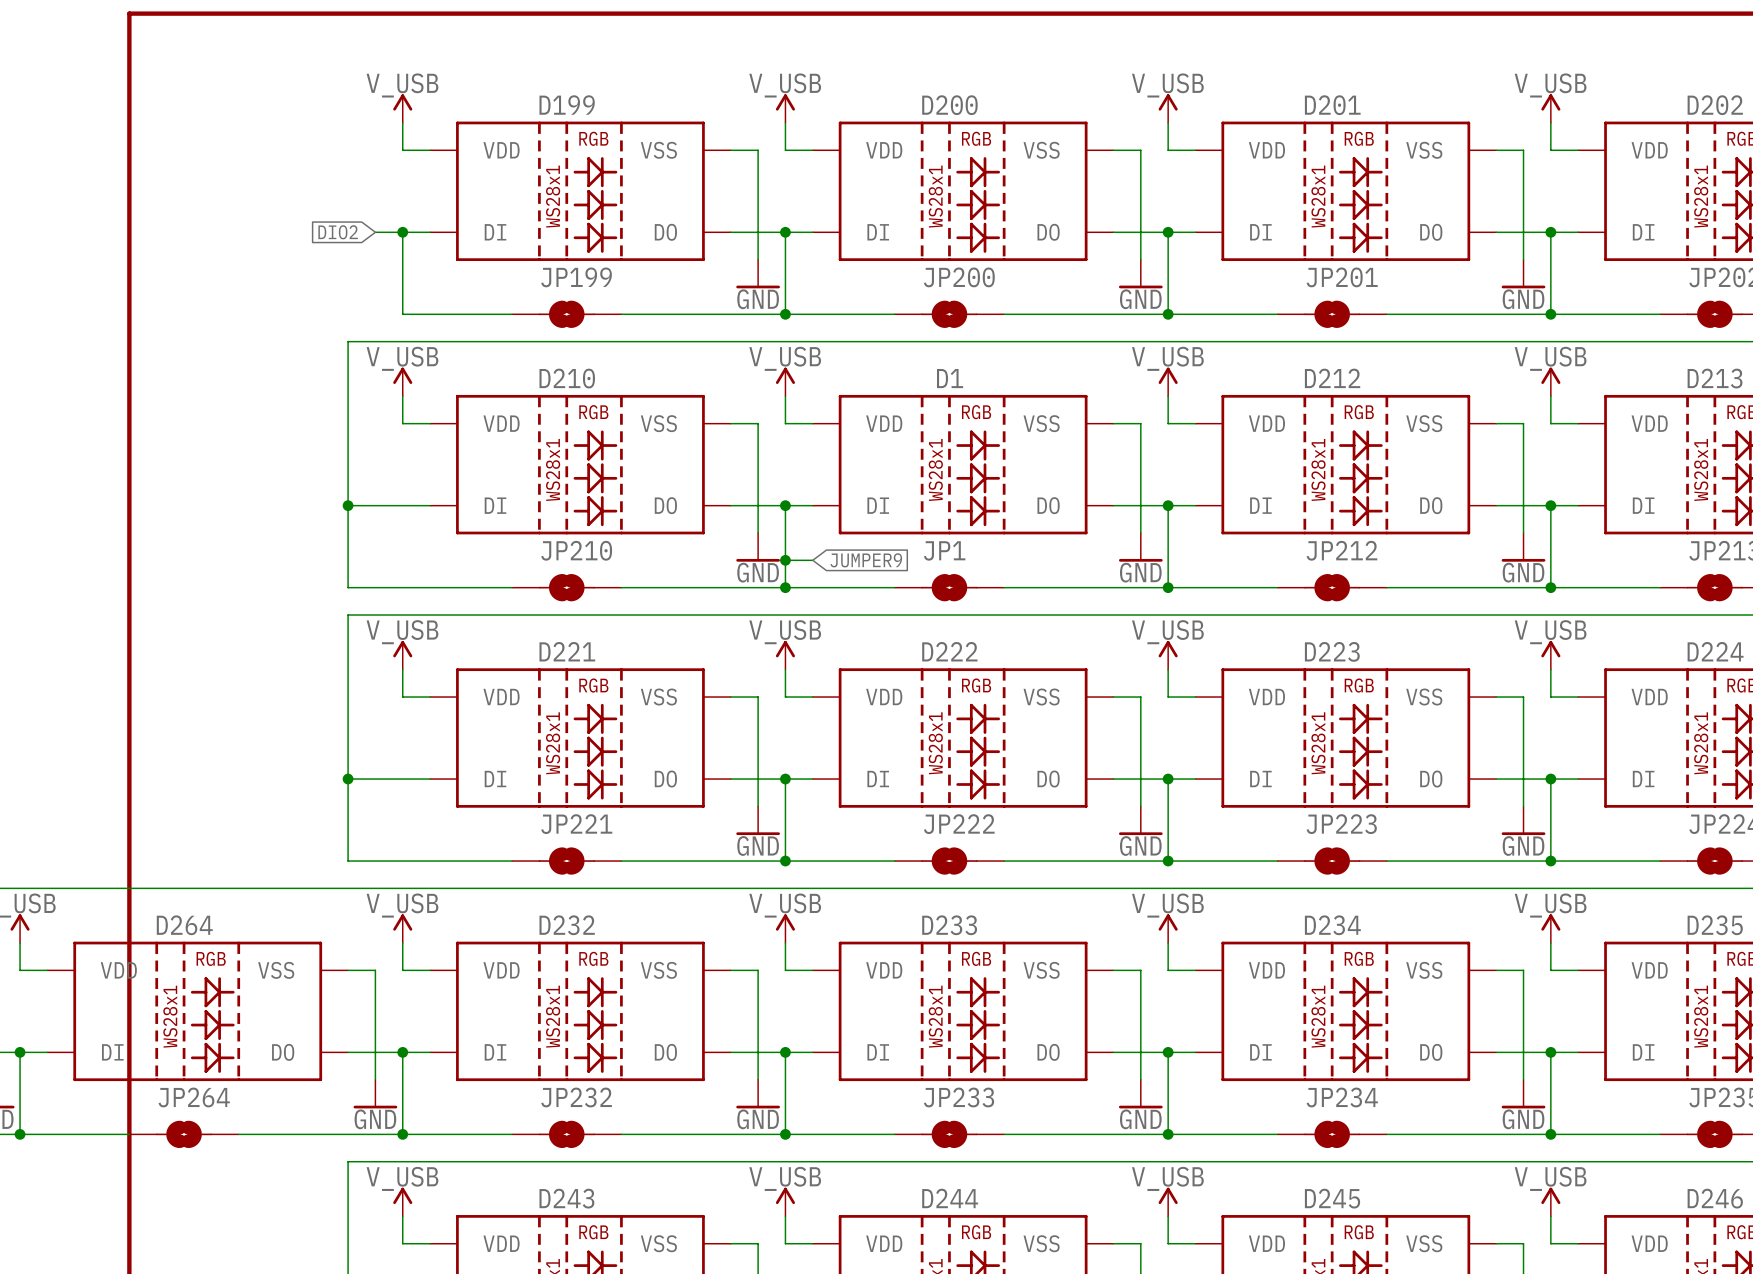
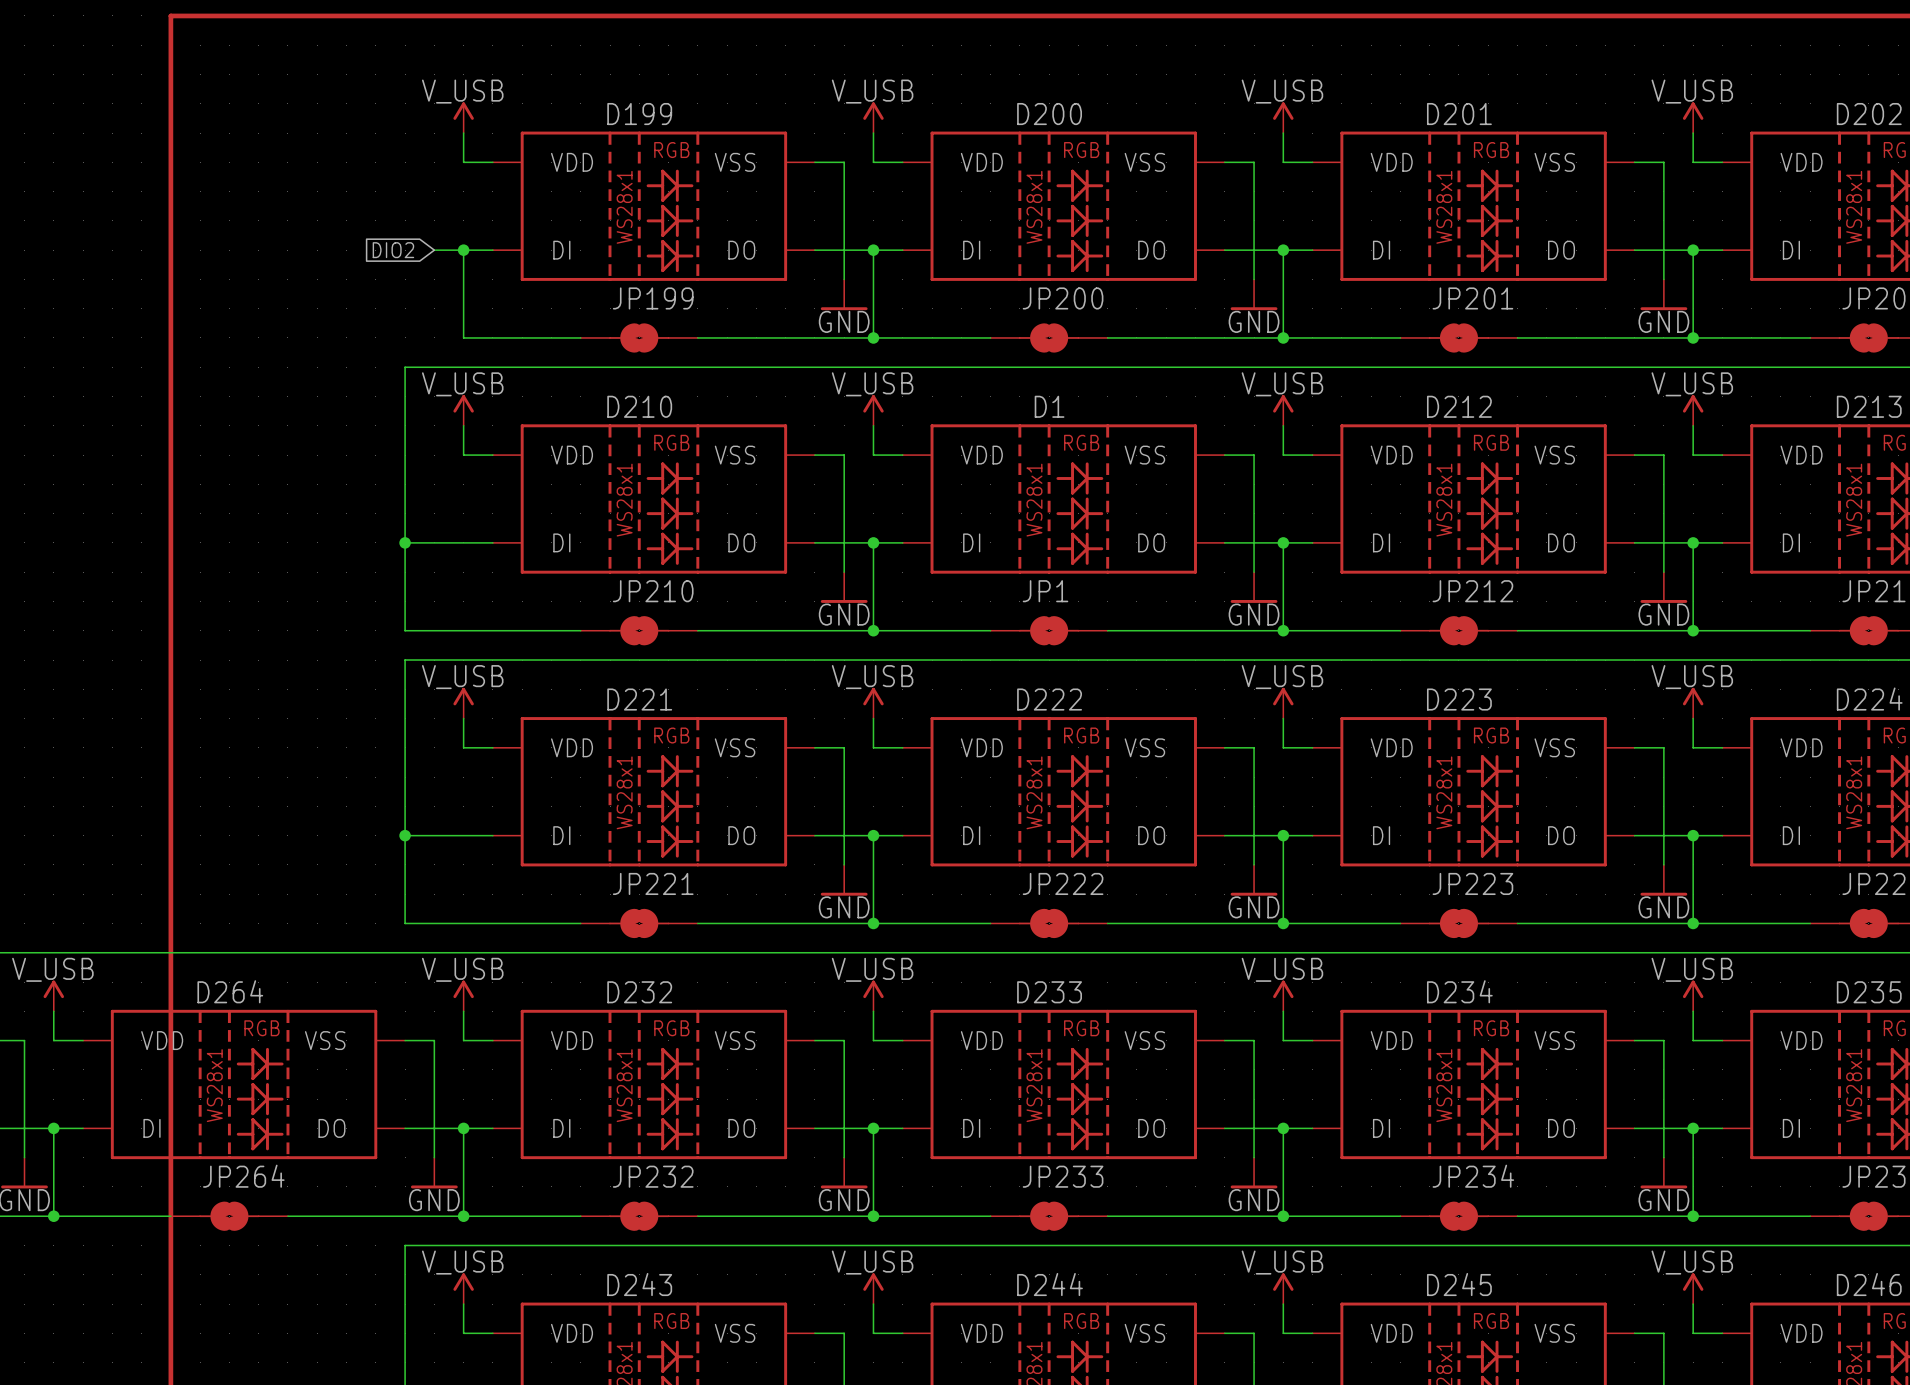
wire: (785, 560) (812, 560) -> none
junction: (785, 560) -> none
global label: JUMPER9 (866, 560) -> none

